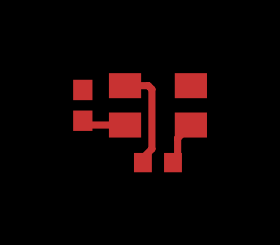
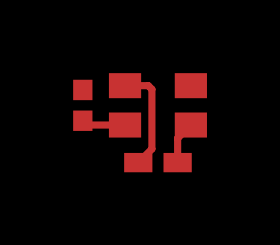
part footprint: [133, 152, 182, 173] -> [124, 152, 192, 173]

